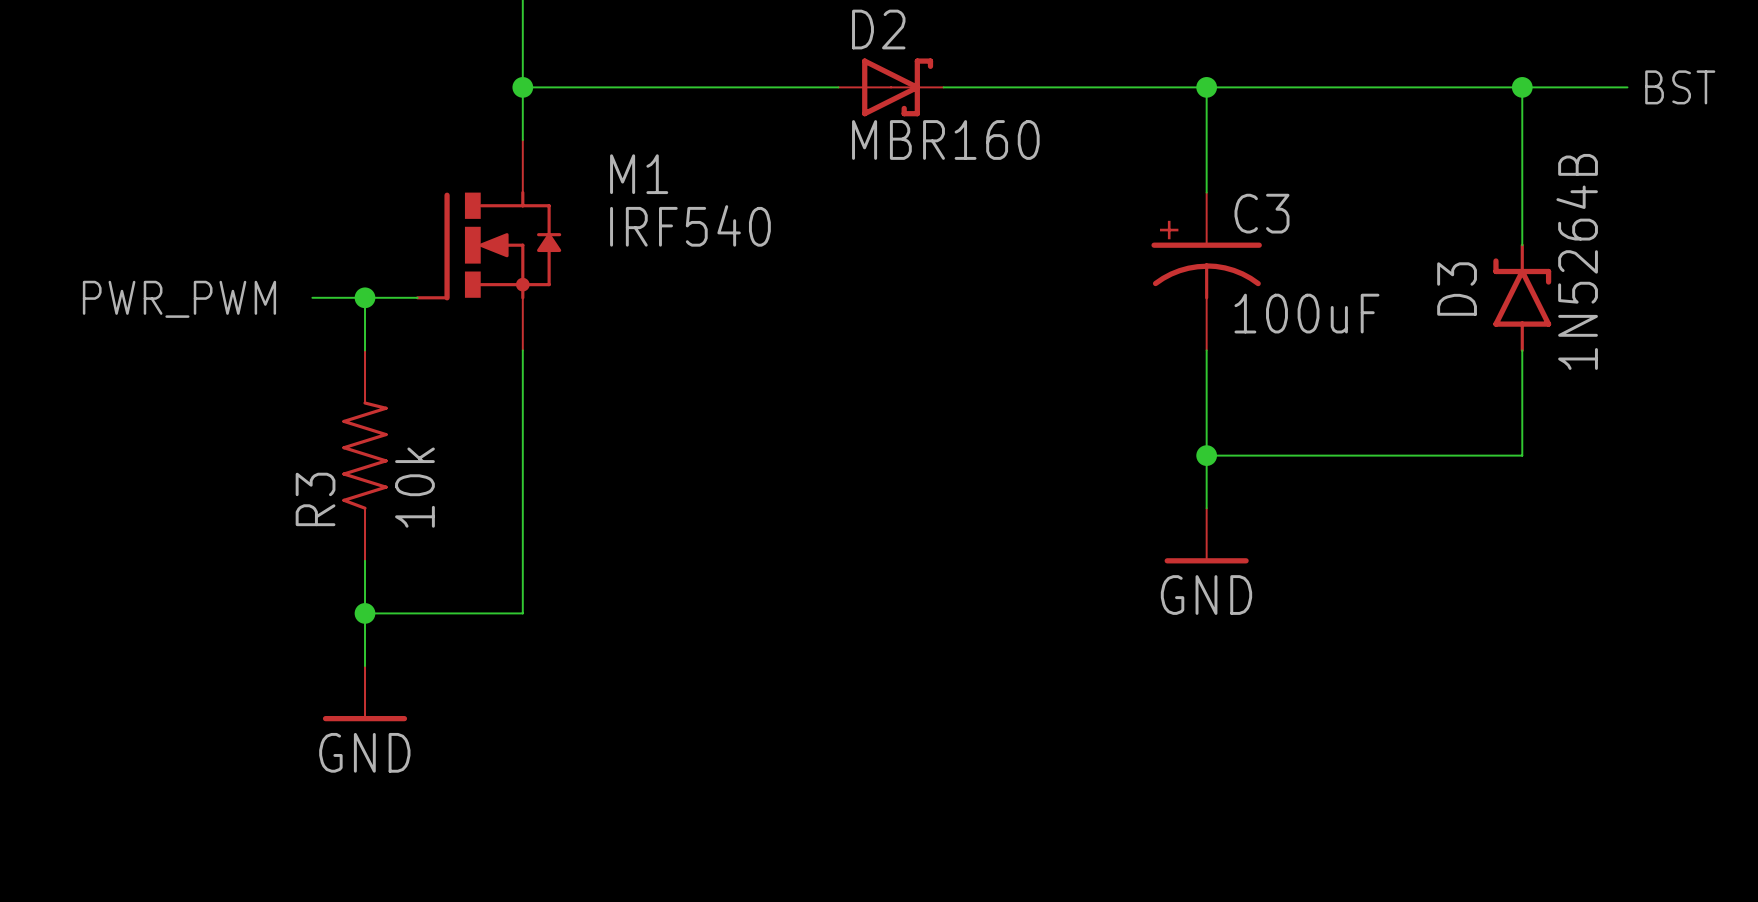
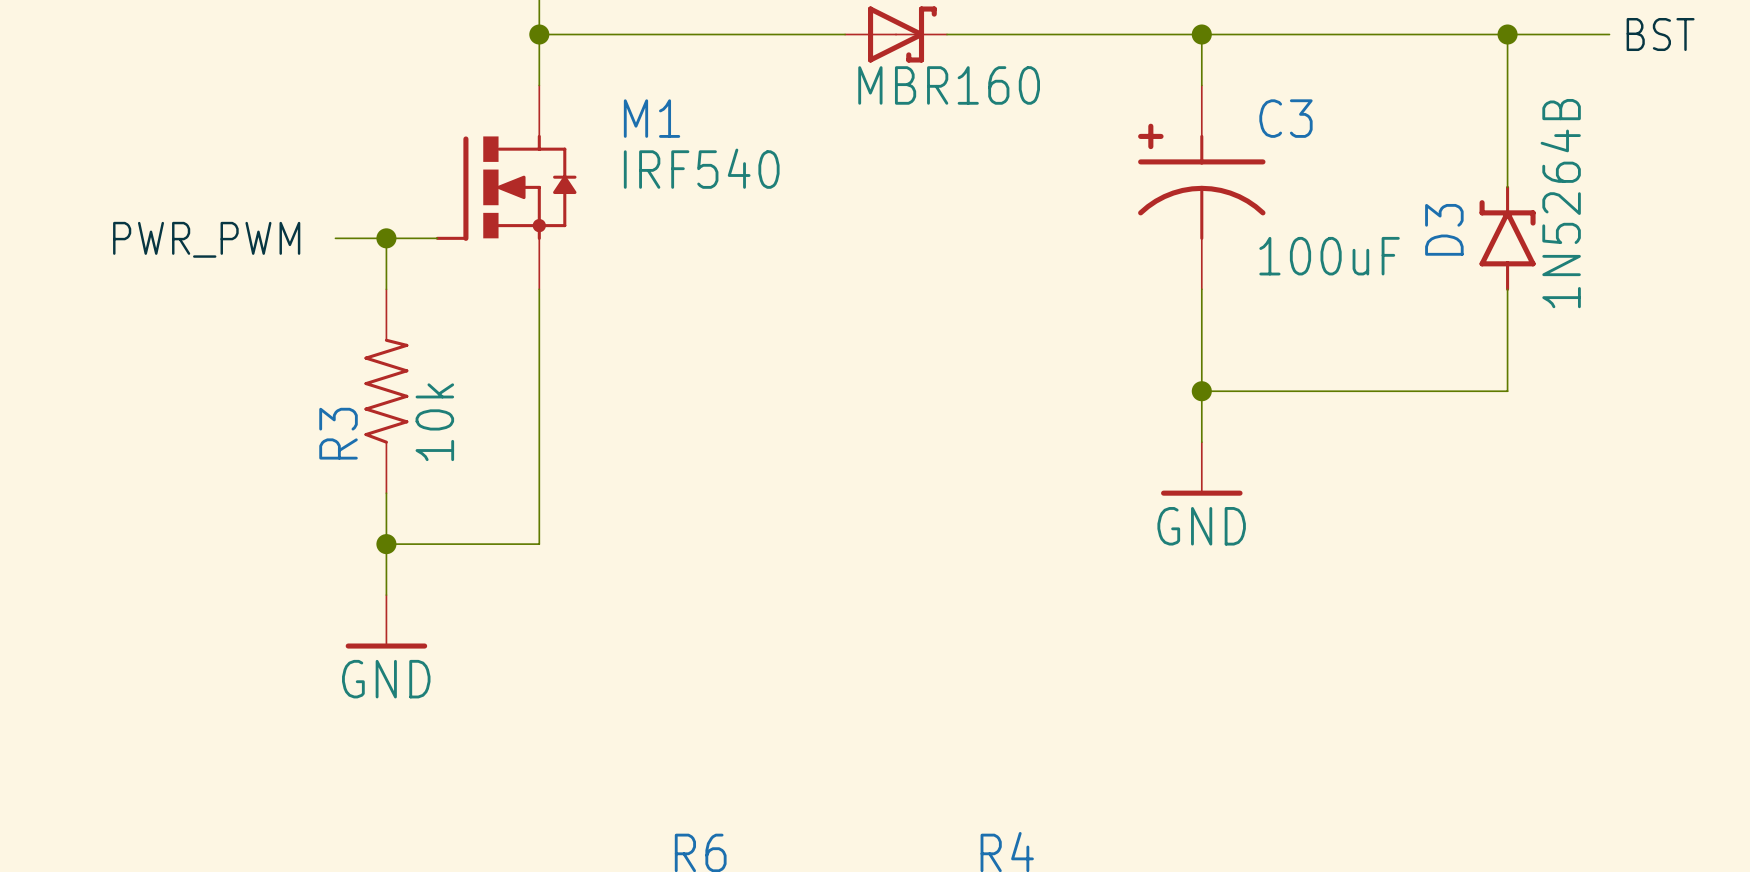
C3 symbol: [1151, 192, 1262, 351] -> [1138, 85, 1266, 290]
C3 value position: 100uF (1306, 313) -> 100uF (1329, 256)

